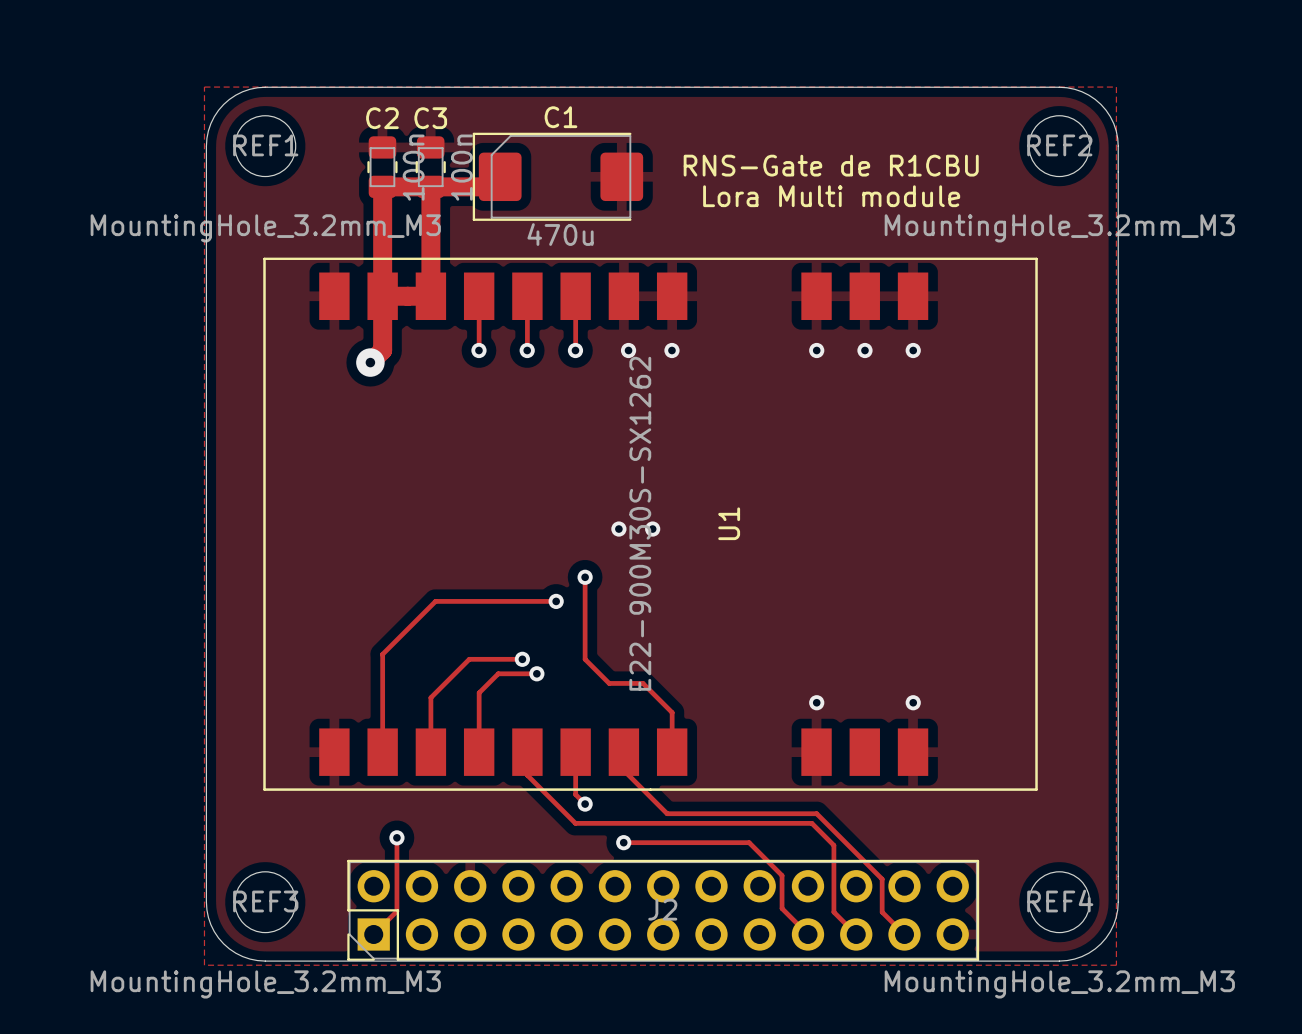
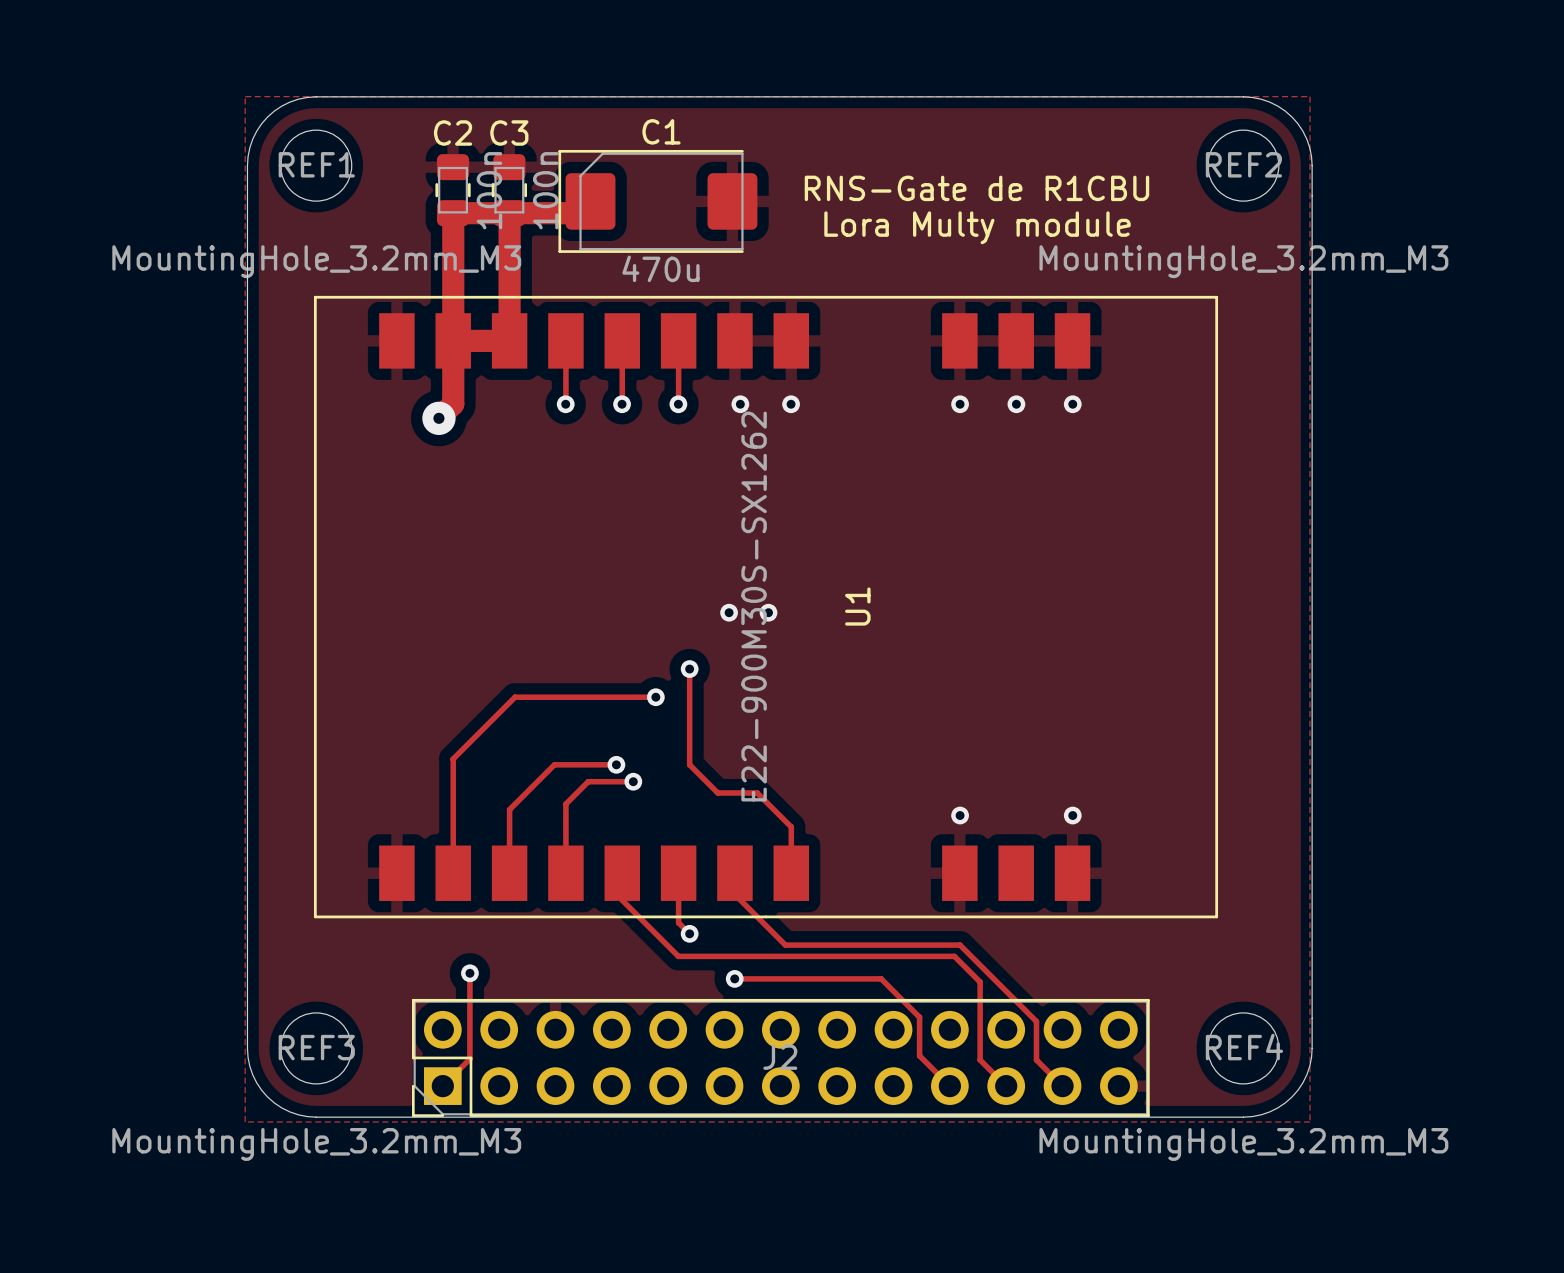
text: Lora Multi module (831, 196) -> Lora Multy module (977, 227)

